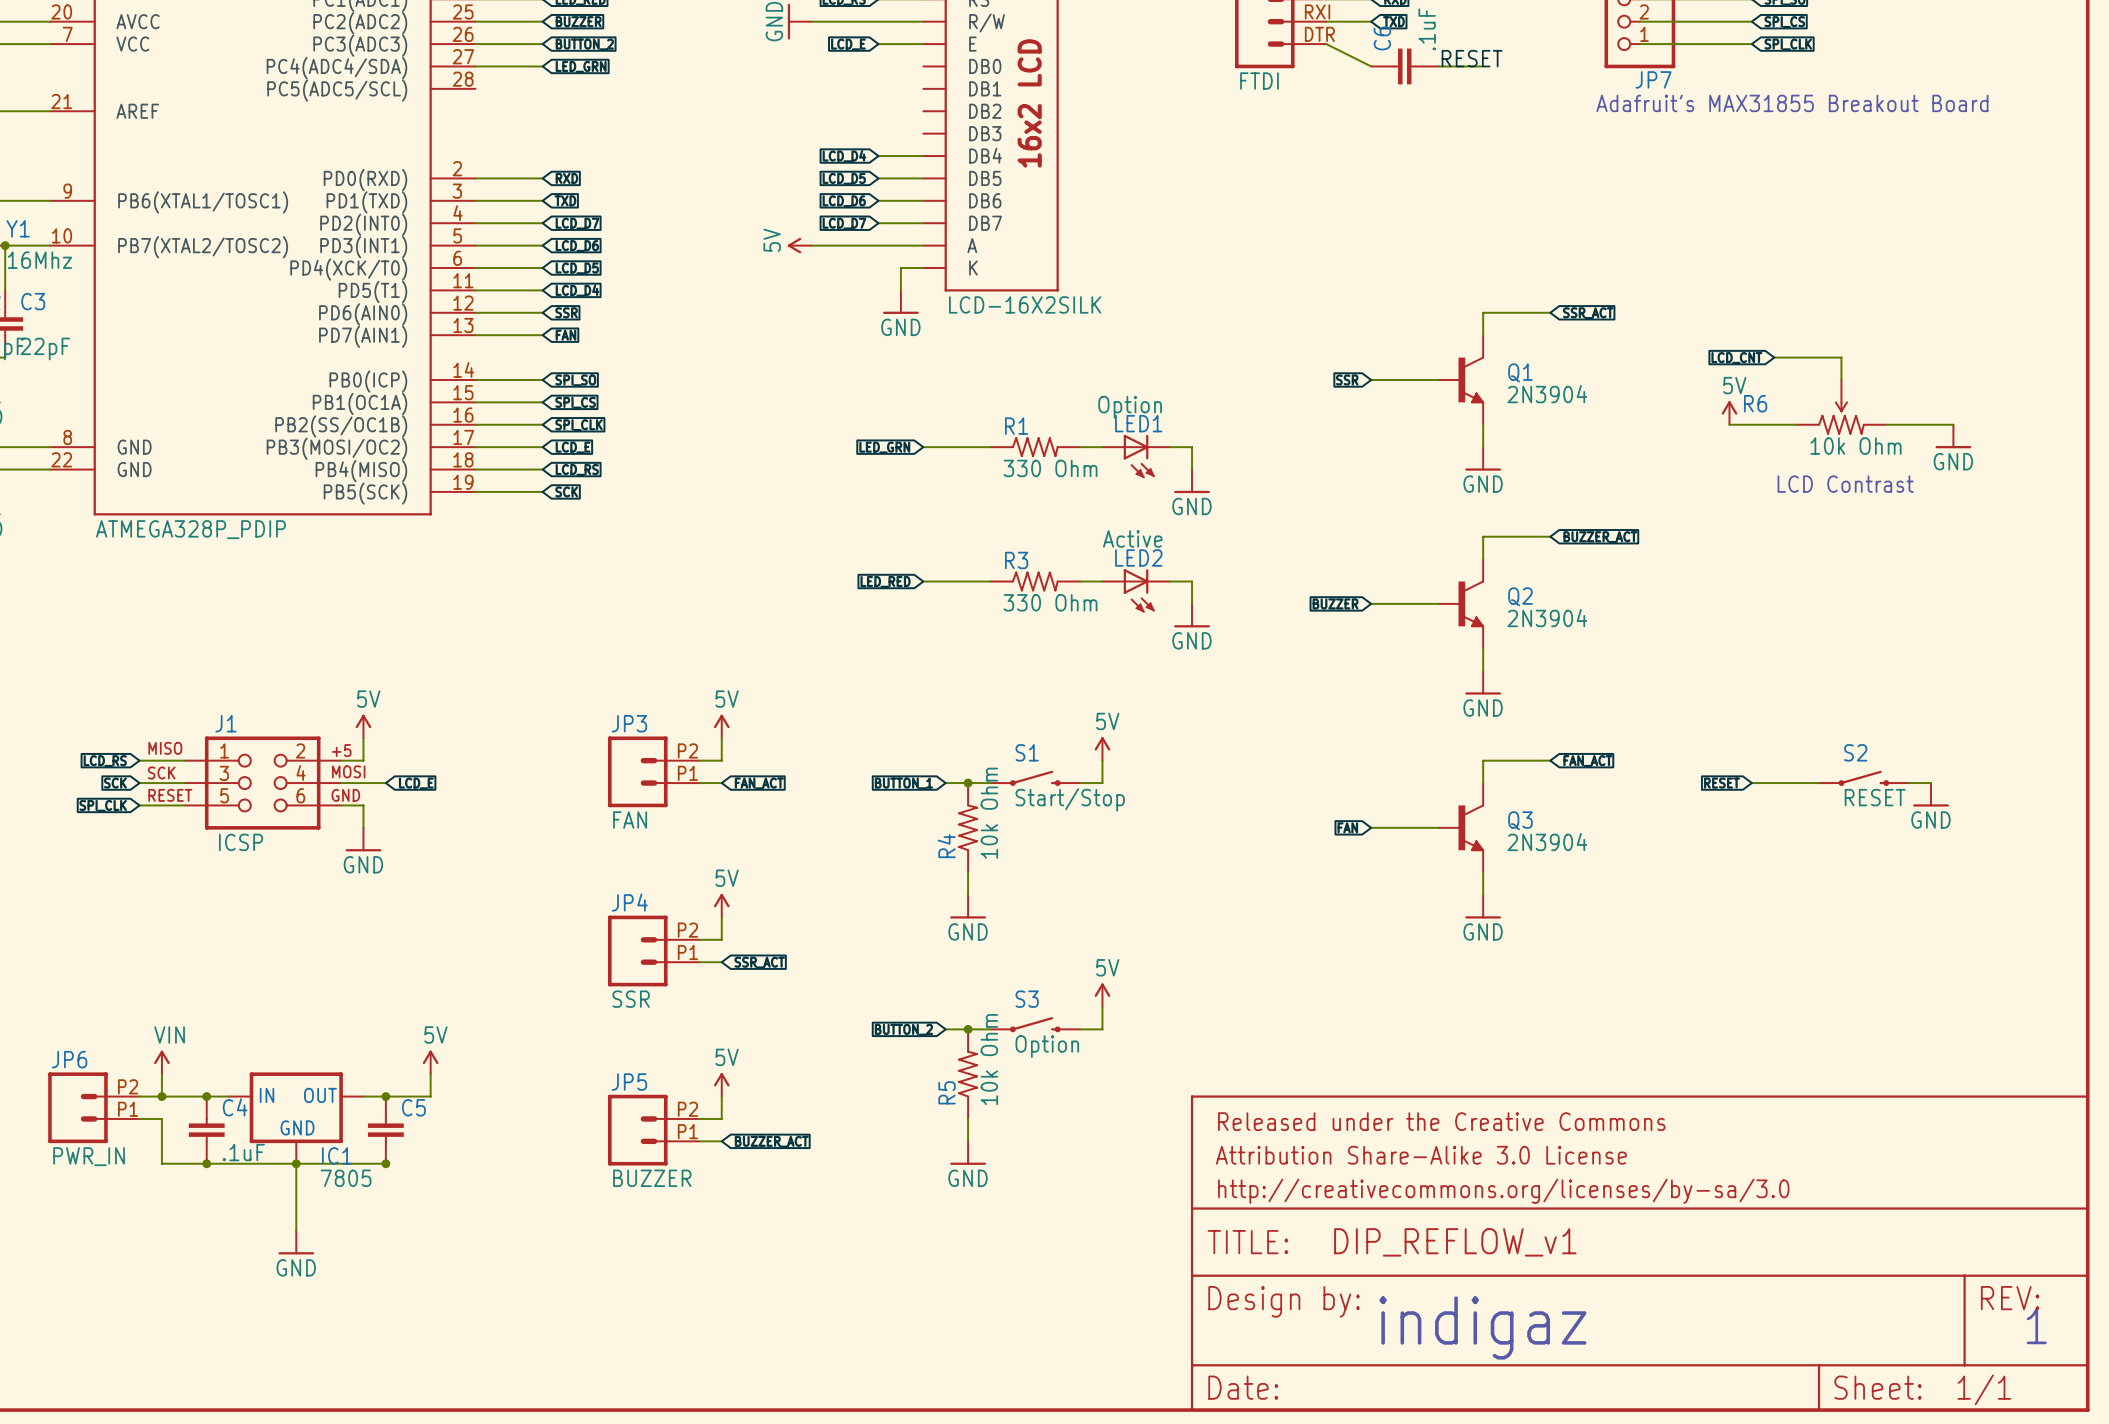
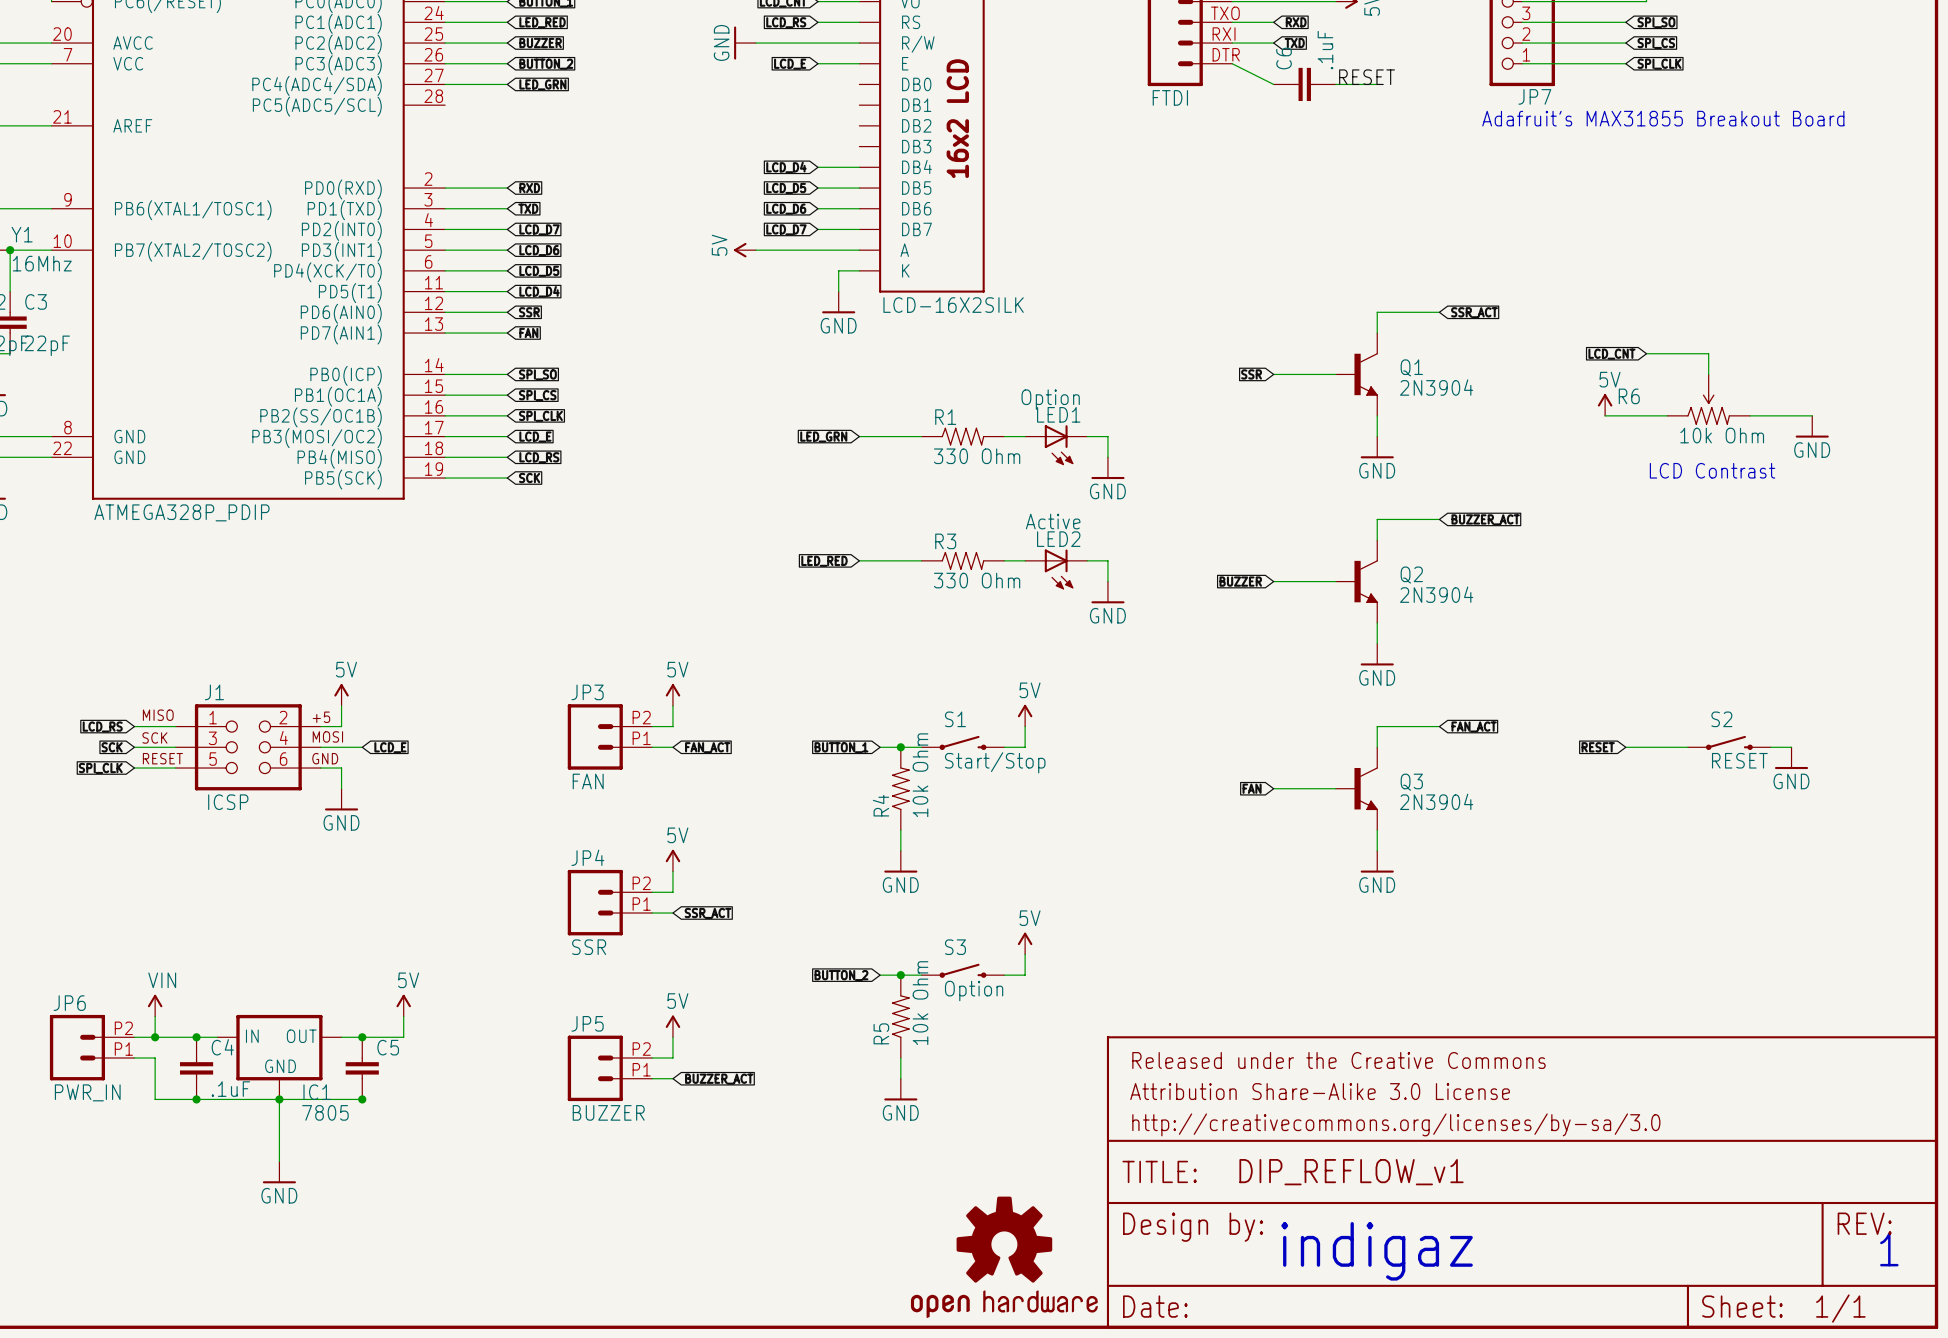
part: none -> (1004, 1257)

